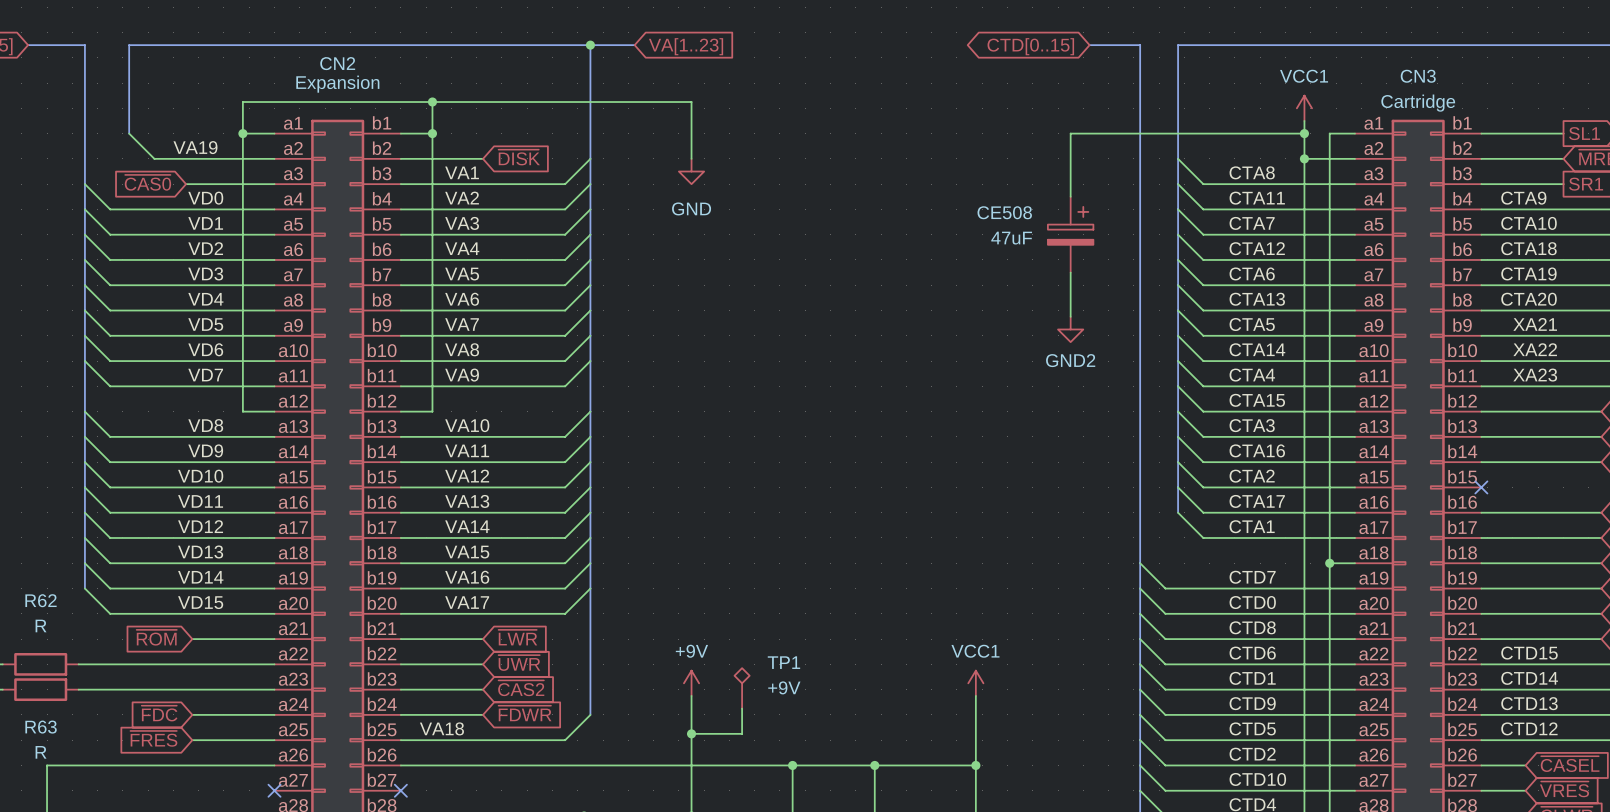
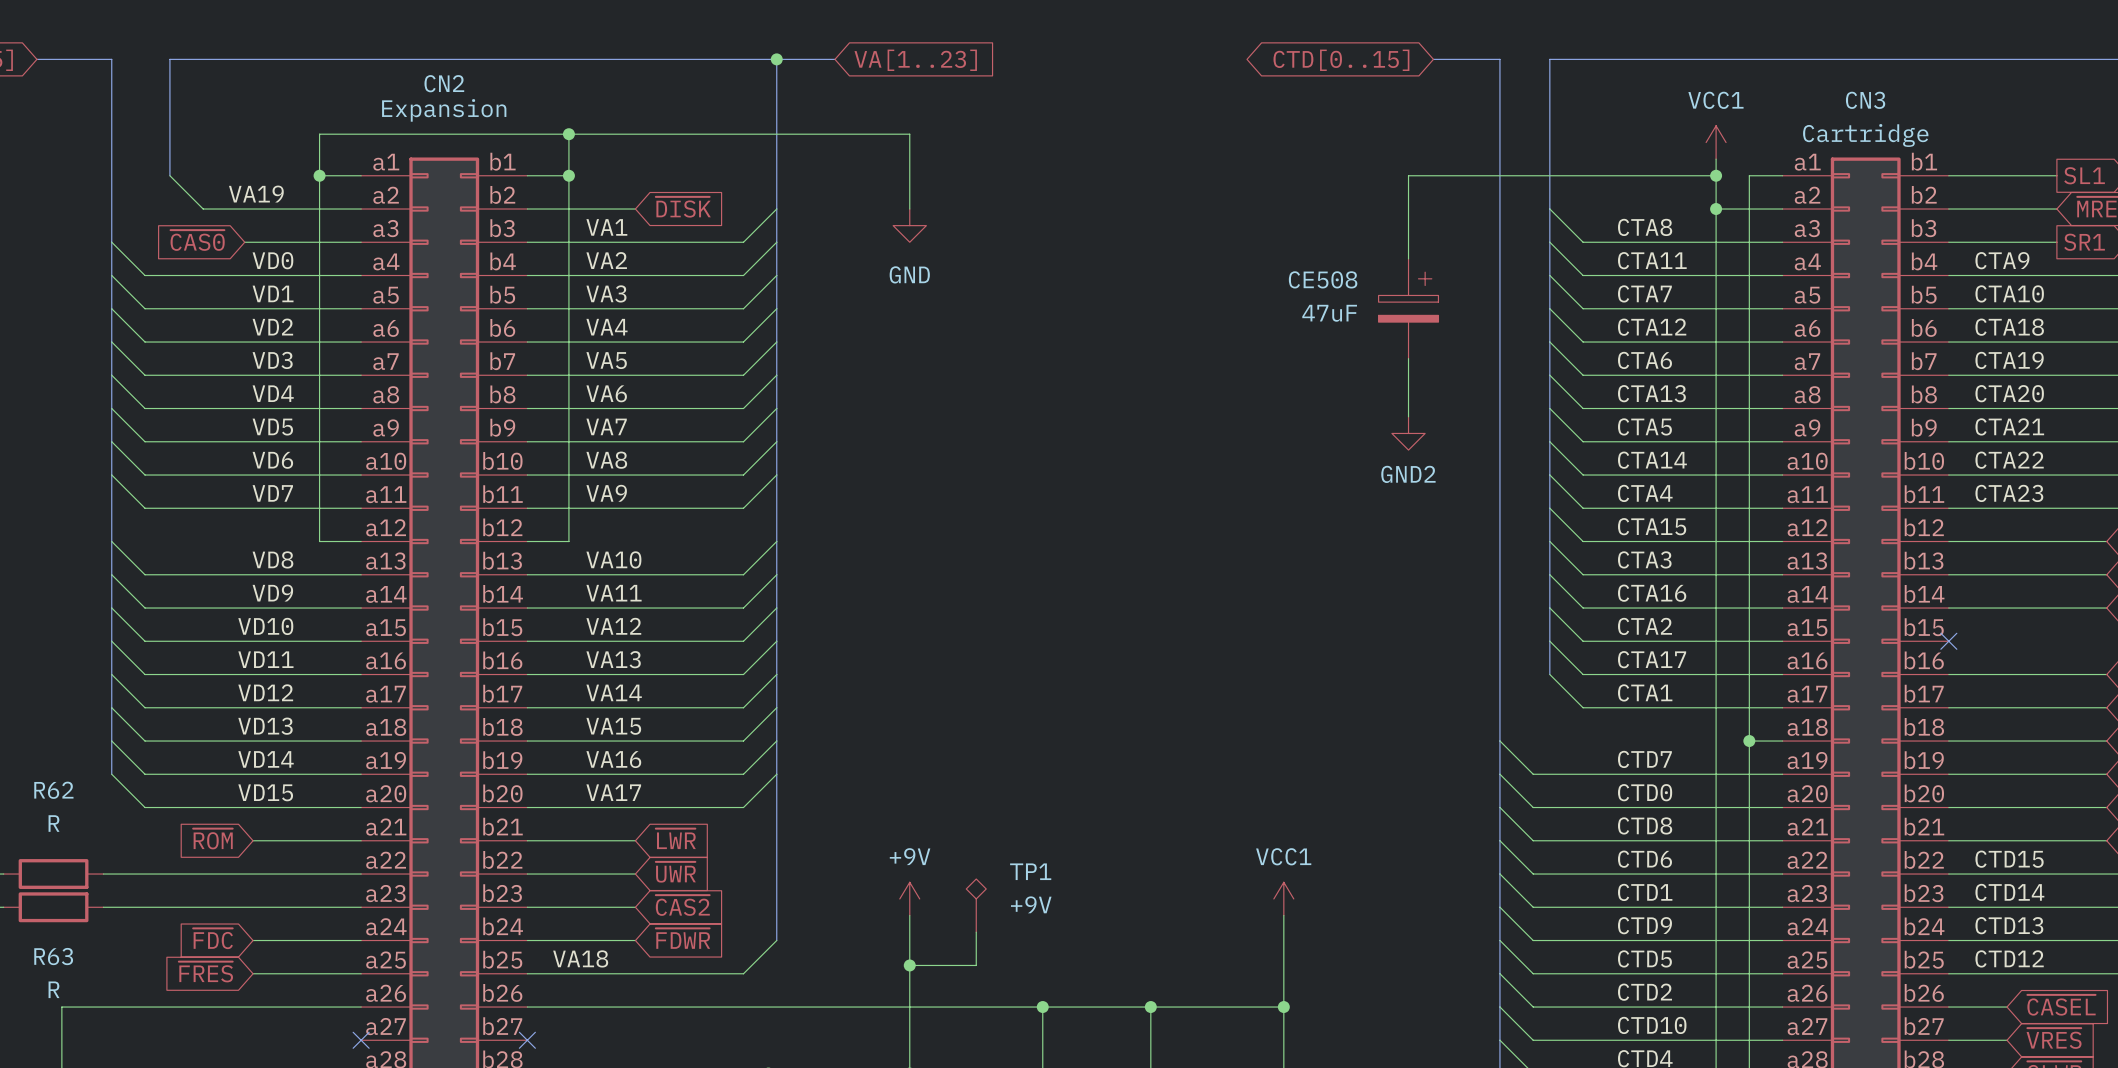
label: XA21 (1535, 324) -> CTA21 (2009, 426)
label: XA22 (1535, 349) -> CTA22 (2009, 460)
label: XA23 (1535, 375) -> CTA23 (2009, 493)

